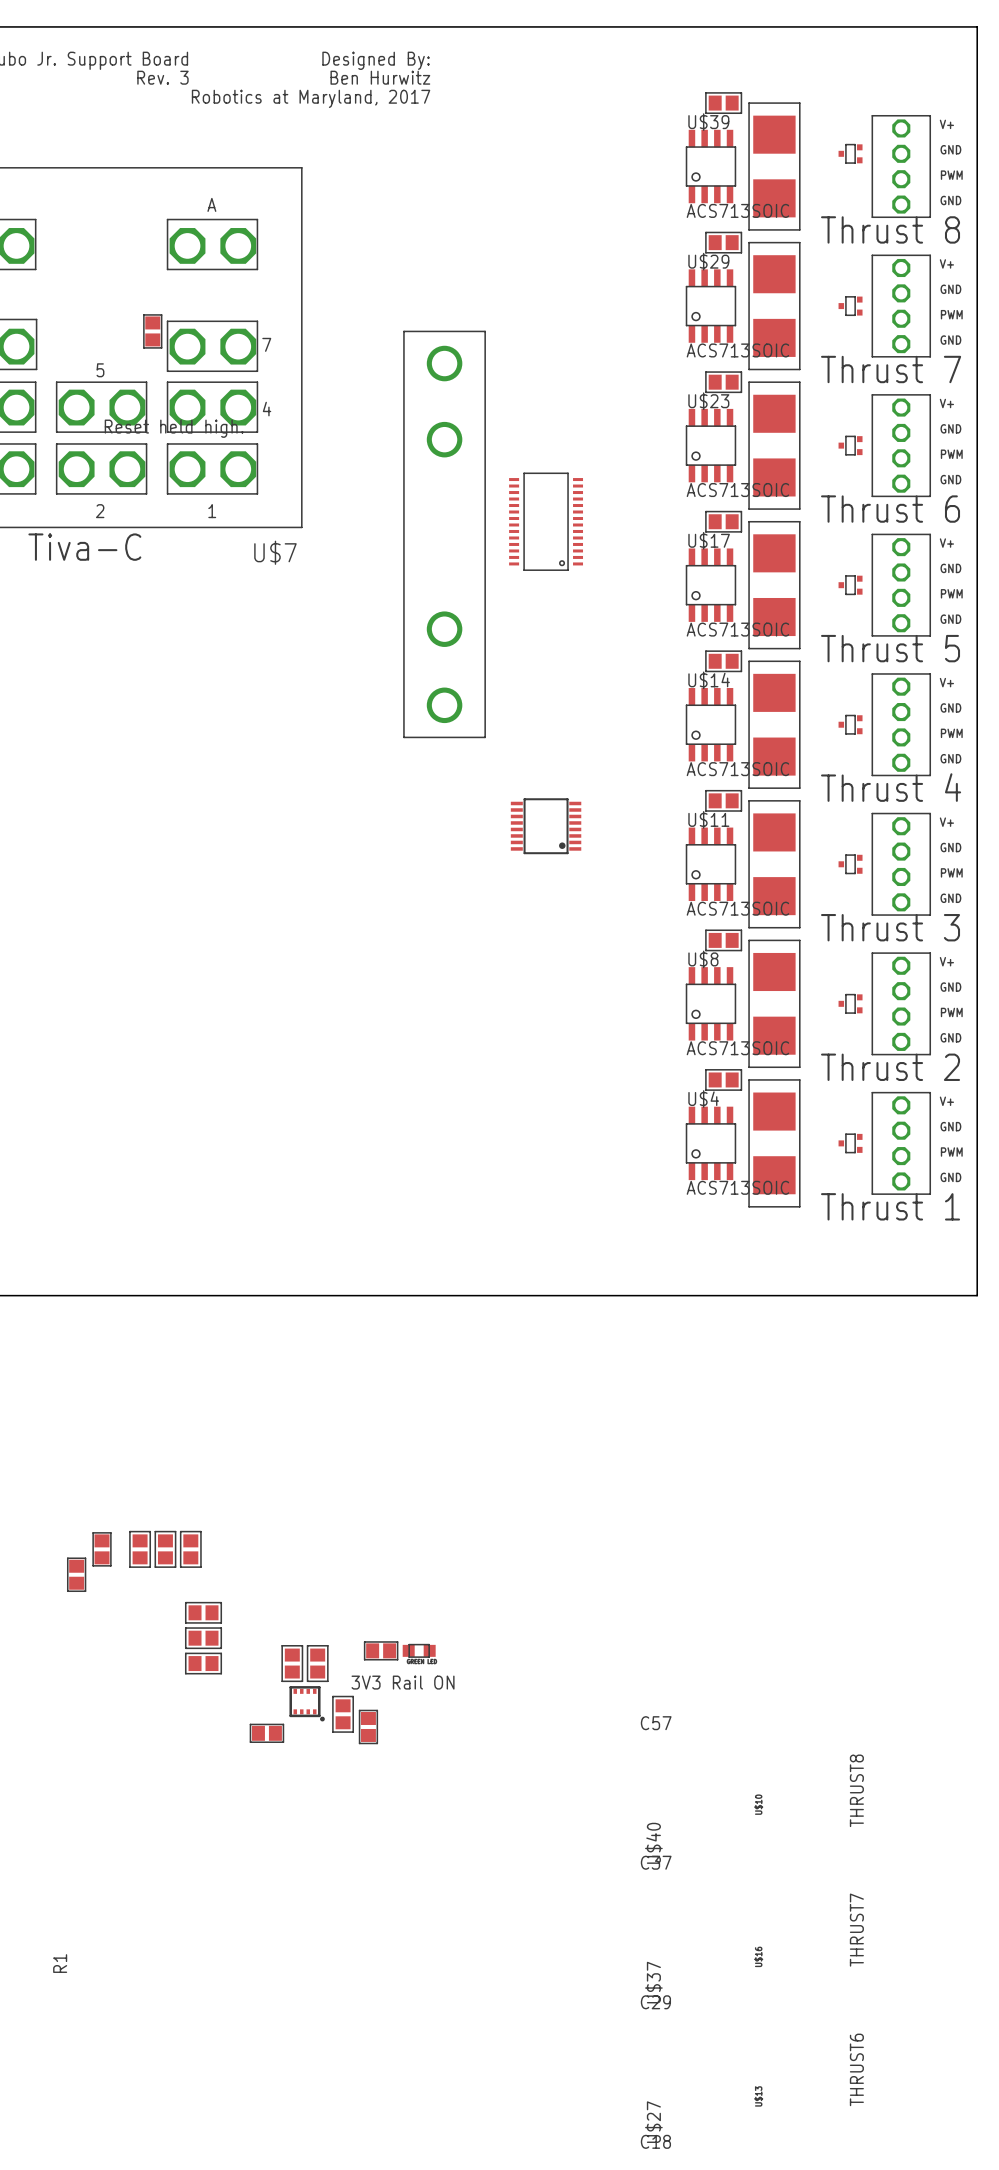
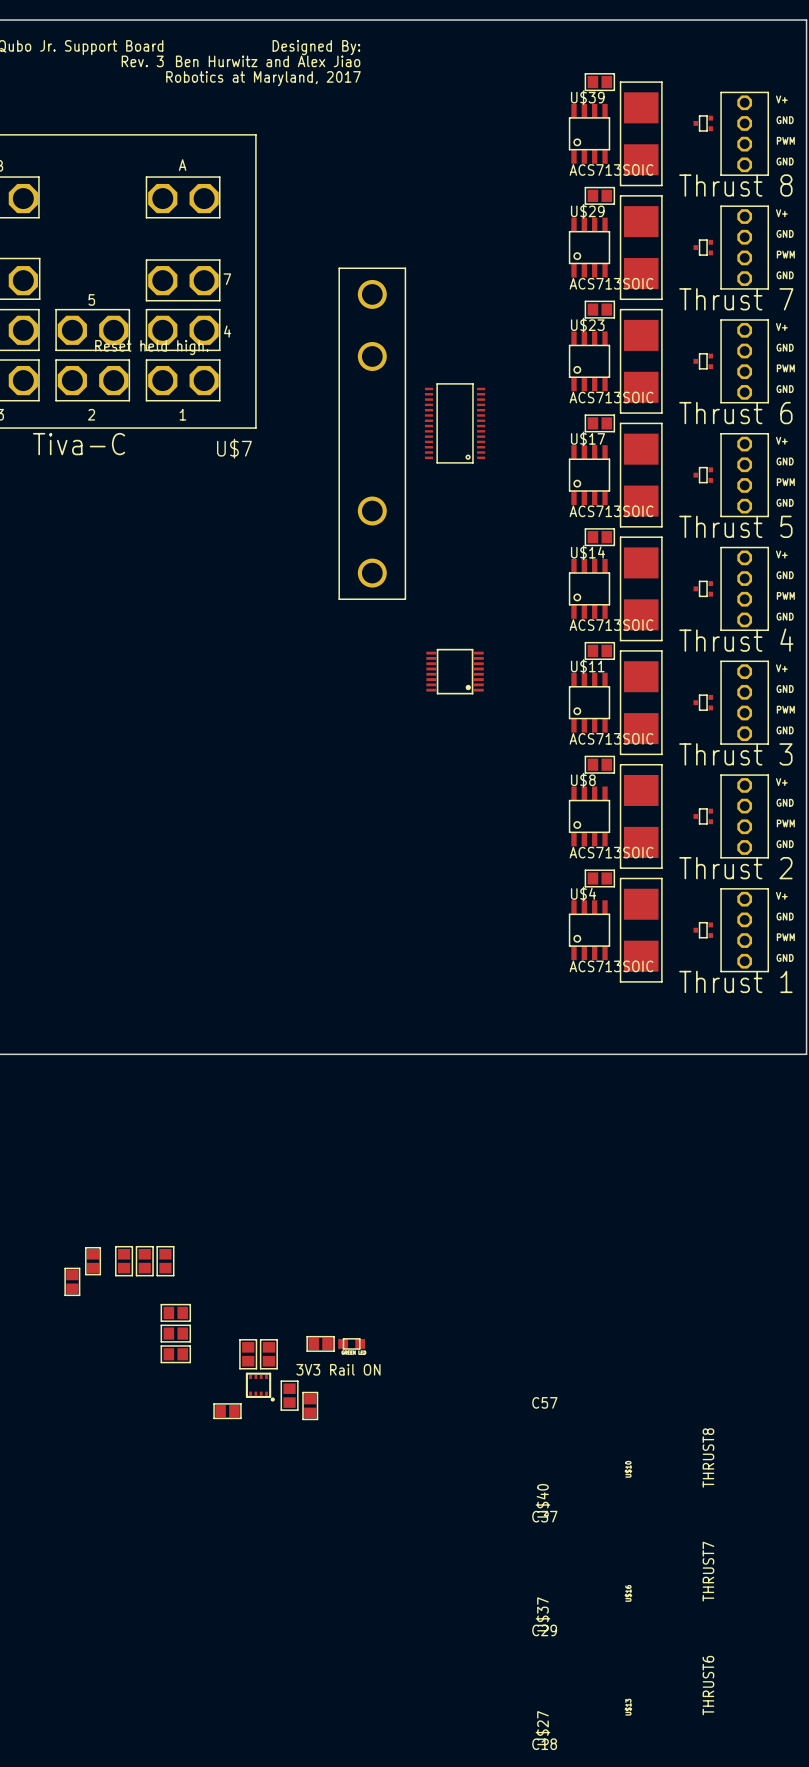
text: Ben Hurwitz (380, 77) -> Ben Hurwitz and Alex Jiao (268, 61)
R1: (152, 331) -> none

